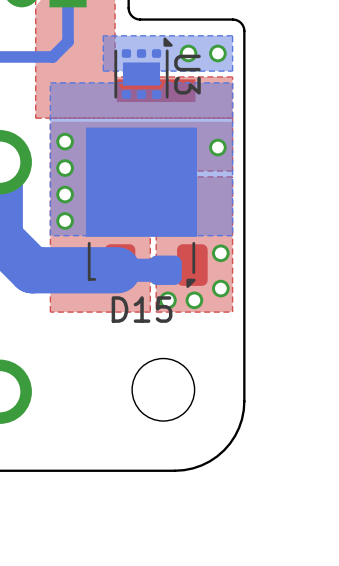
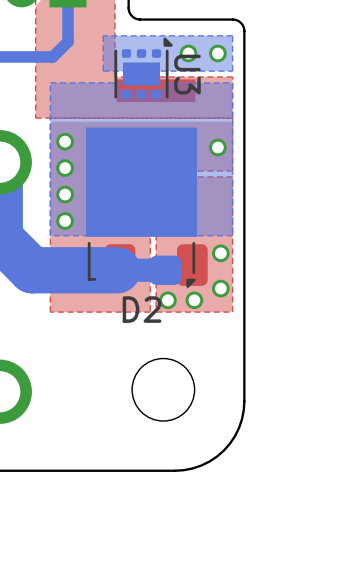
D15 name: D15 (142, 309) -> D2 (142, 309)

